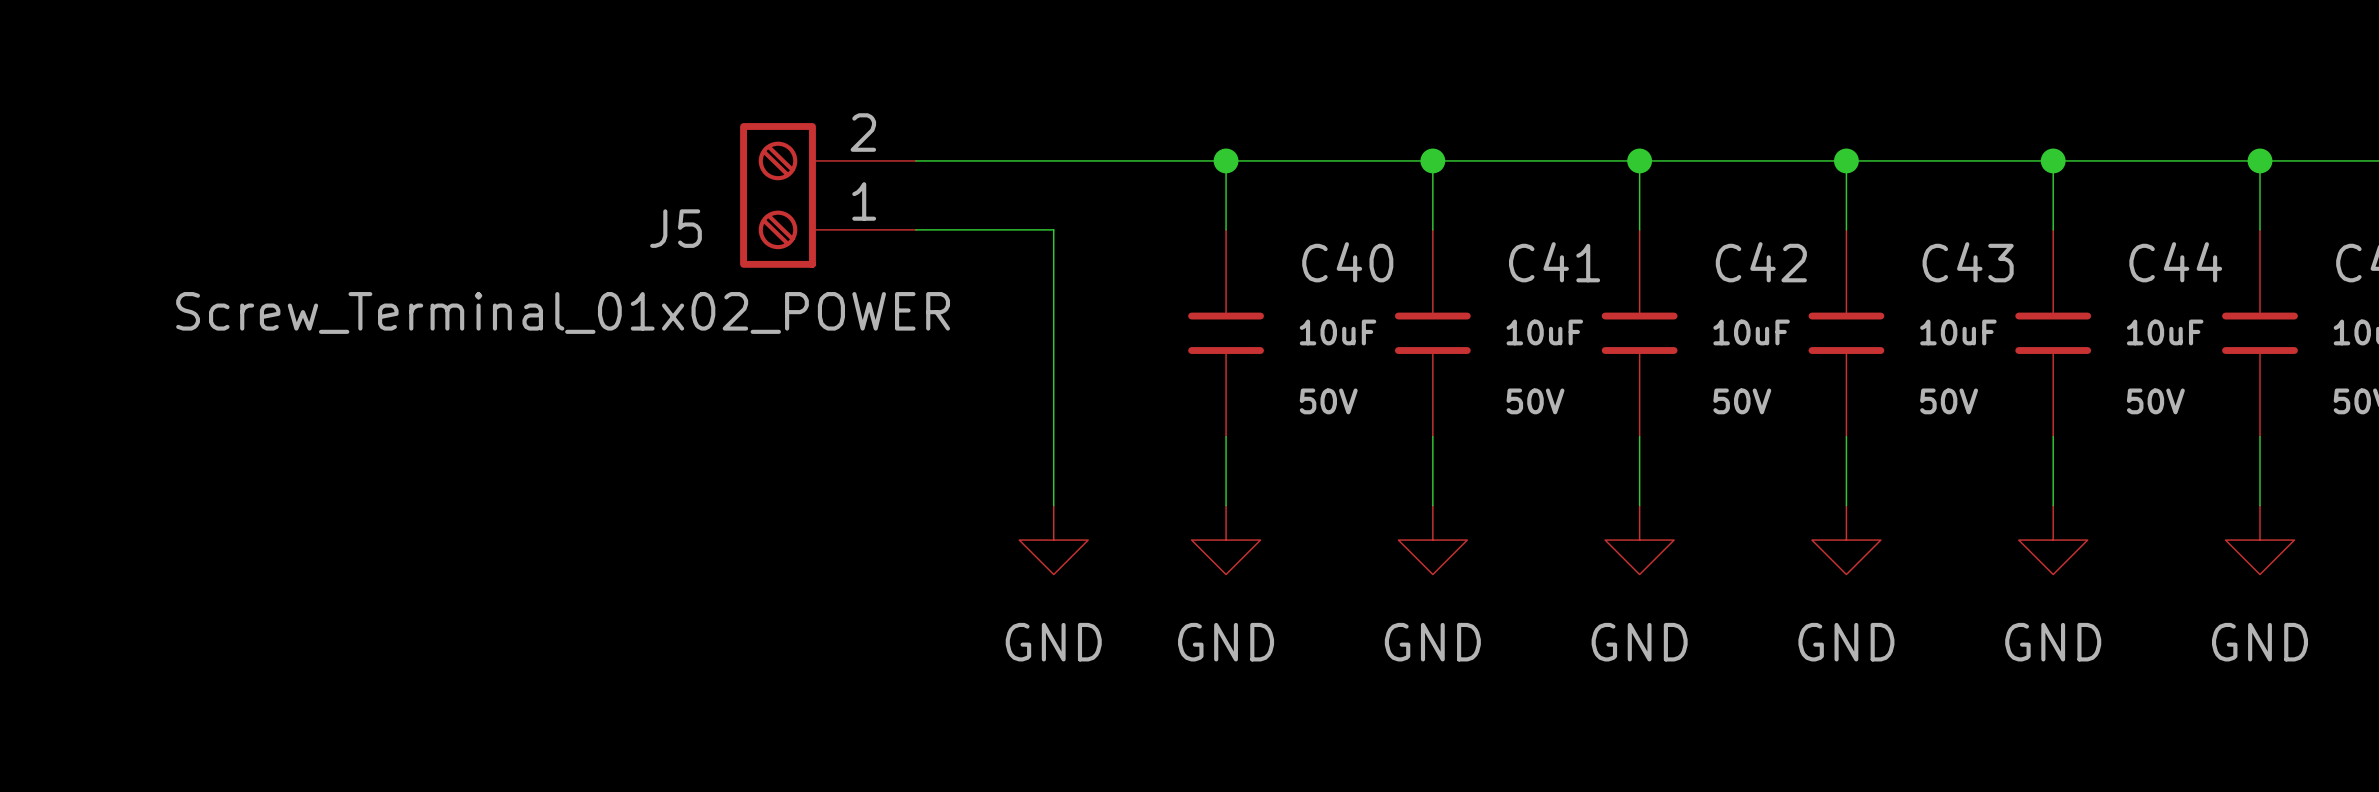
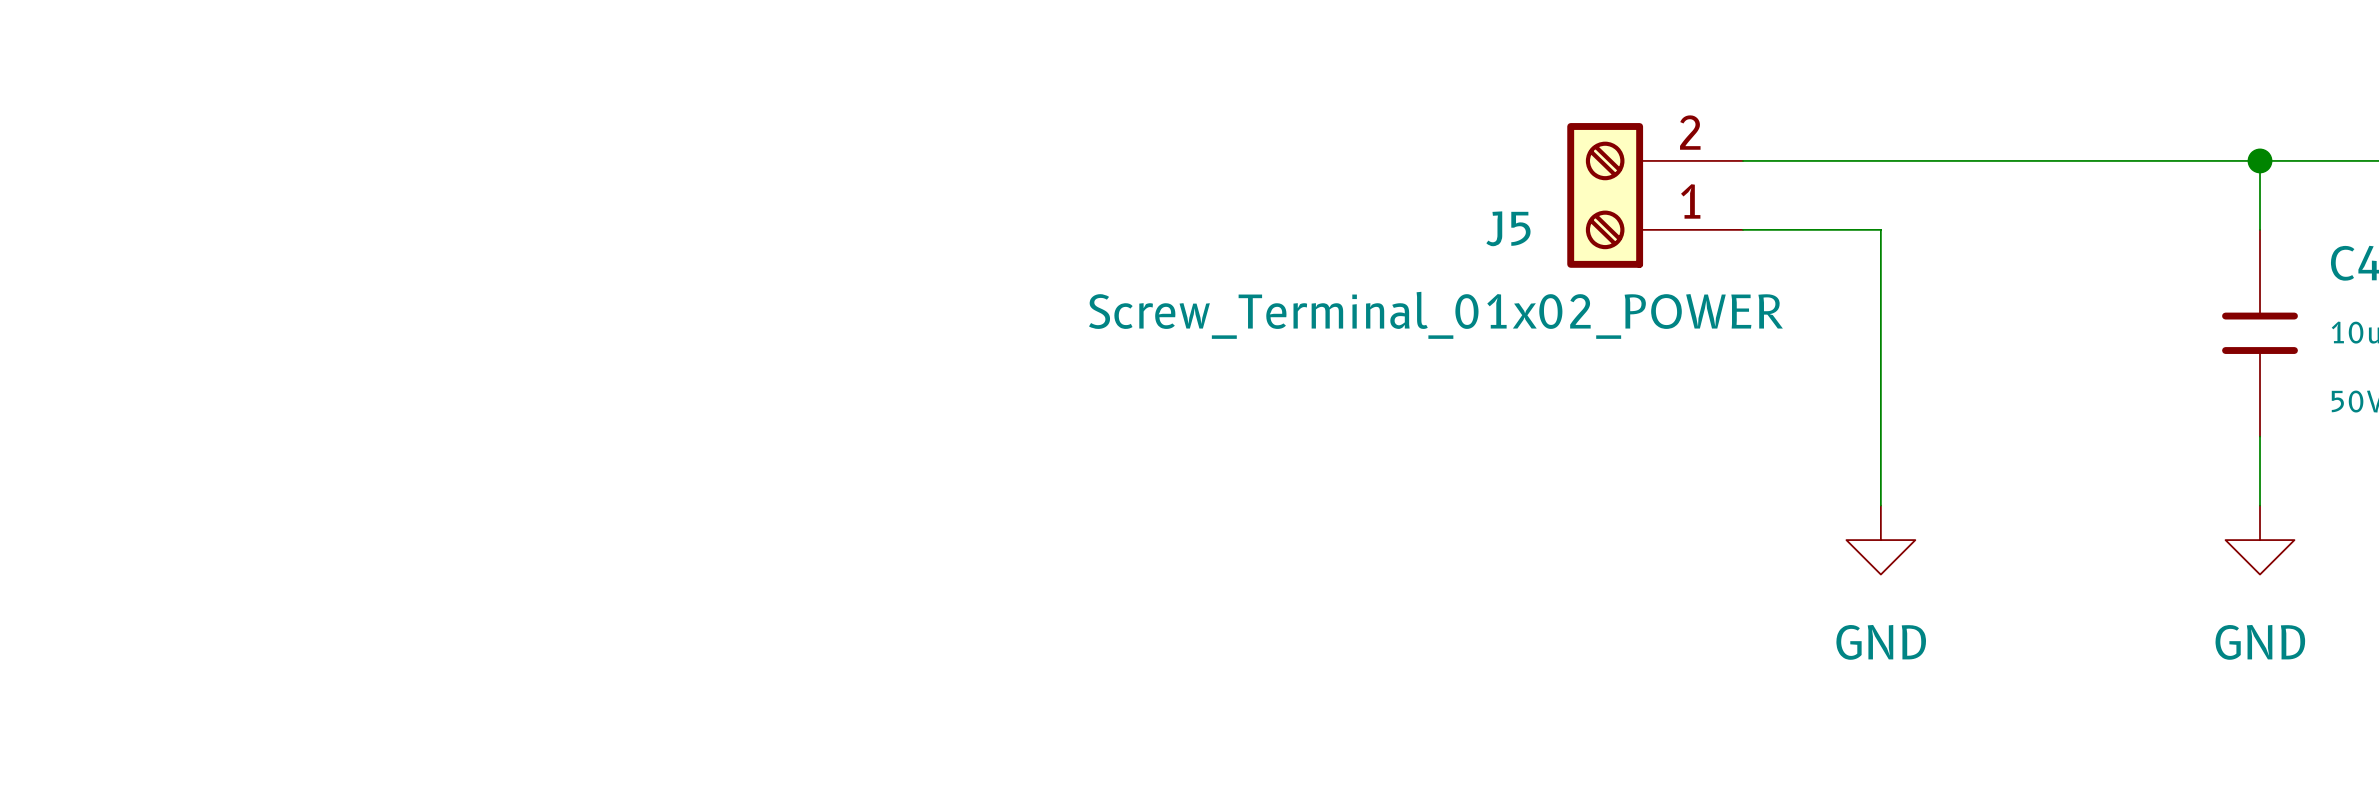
wire: (915, 160) (1743, 160) -> none
wire: (1226, 160) (1226, 229) -> none
junction: (1226, 160) -> none
wire: (1432, 160) (1432, 229) -> none
junction: (1432, 160) -> none
junction: (1639, 160) -> none
wire: (1846, 160) (1846, 229) -> none
junction: (1846, 160) -> none
wire: (2053, 160) (2053, 229) -> none
junction: (2053, 160) -> none
J5 position: (827, 195) -> (1655, 195)
wire: (915, 229) (1053, 229) (1053, 505) -> none
wire: none -> (1743, 229) (1880, 229) (1880, 505)
C40: 10uF (1226, 333) -> none
C41: 10uF (1432, 333) -> none
C42: 10uF (1639, 333) -> none
C43: 10uF (1846, 333) -> none
C44: 10uF (2053, 333) -> none
wire: (1226, 436) (1226, 505) -> none
wire: (1432, 436) (1432, 505) -> none
wire: (1639, 436) (1639, 505) -> none
wire: (1846, 436) (1846, 505) -> none
wire: (2053, 436) (2053, 505) -> none
power symbol: GND (1053, 540) -> none
power symbol: GND (1226, 540) -> none
power symbol: GND (1432, 540) -> none
power symbol: GND (1639, 540) -> none
power symbol position: GND (1846, 540) -> GND (1880, 540)
power symbol: GND (2053, 540) -> none

